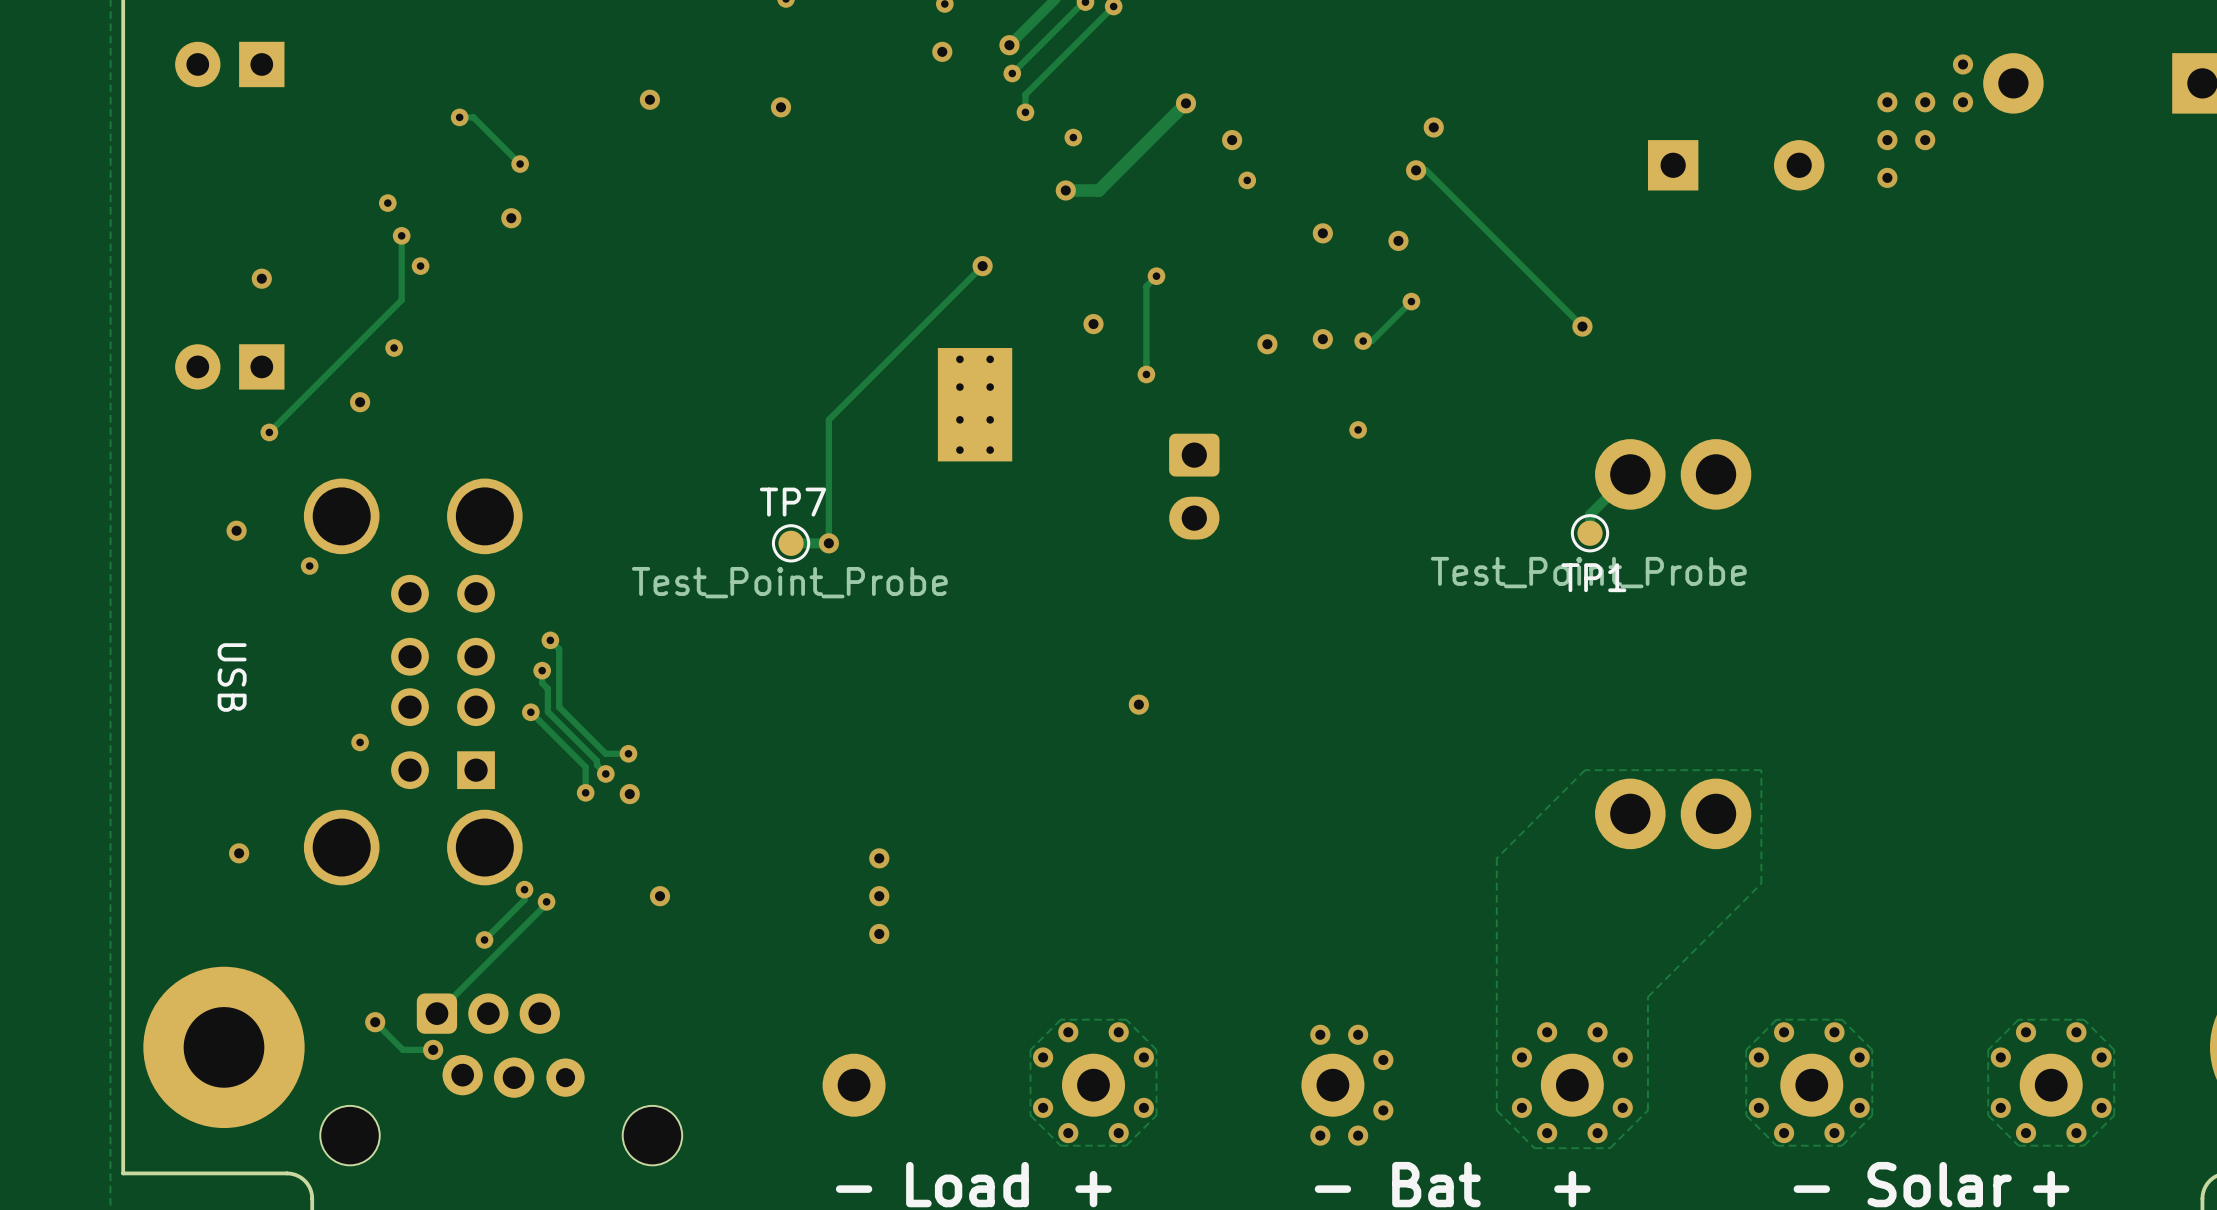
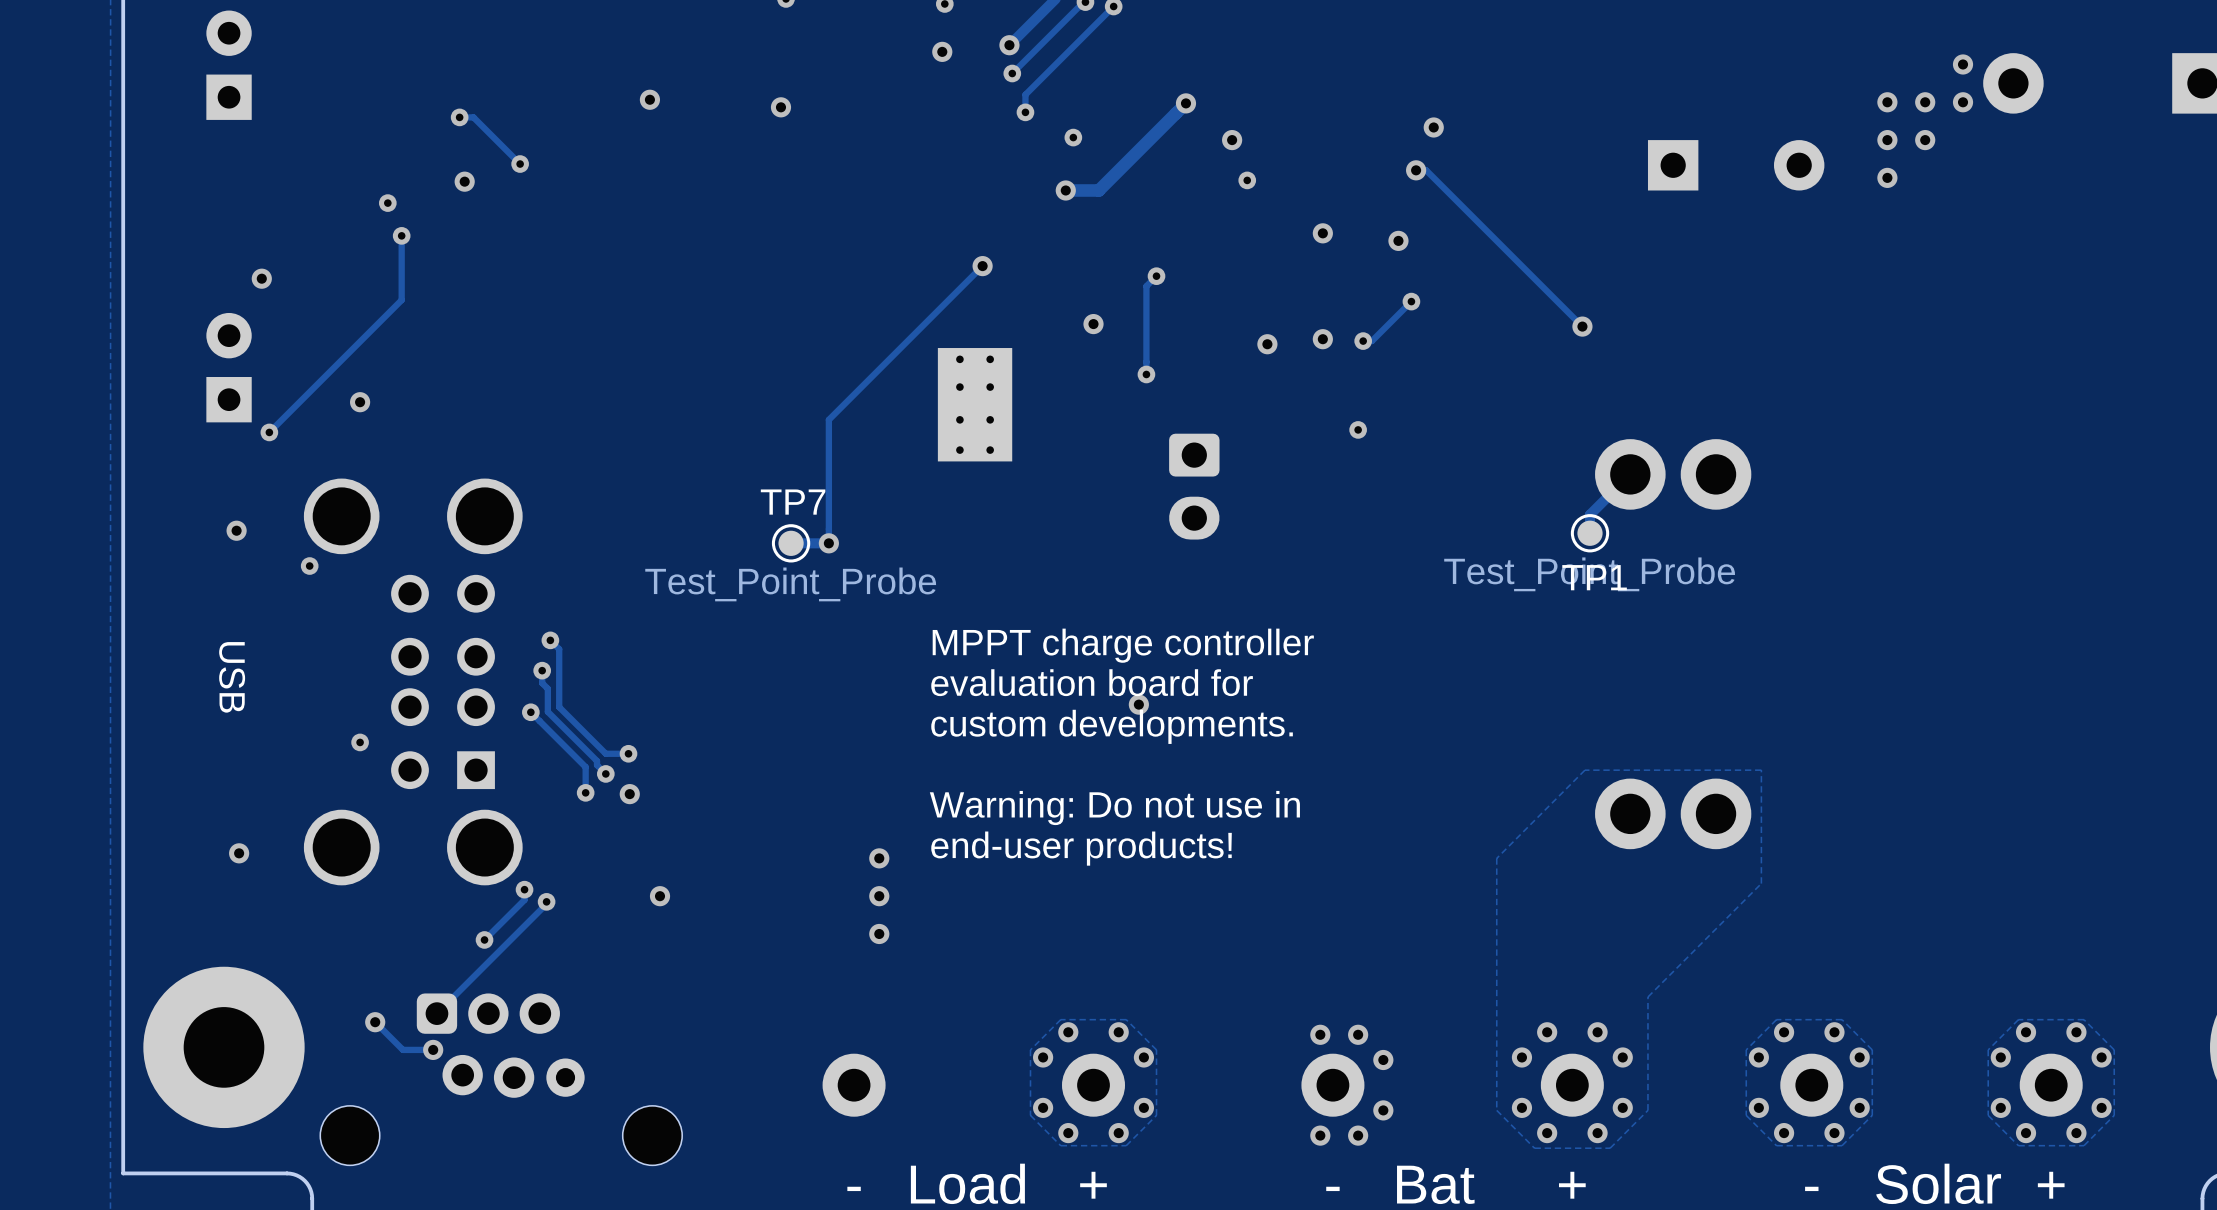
part rotation: 0° (229, 64) -> 90° clockwise (229, 65)
via position: (511, 218) -> (464, 181)
via: (420, 266) -> none
via: (394, 348) -> none
part rotation: 0° (229, 366) -> 90° clockwise (229, 367)
text: none -> MPPT charge controller (1123, 645)
text: none -> evaluation board for (1092, 682)
text: none -> custom developments. (1112, 726)
text: none -> Warning: Do not use in (1114, 808)
text: none -> end-user products! (1081, 848)

